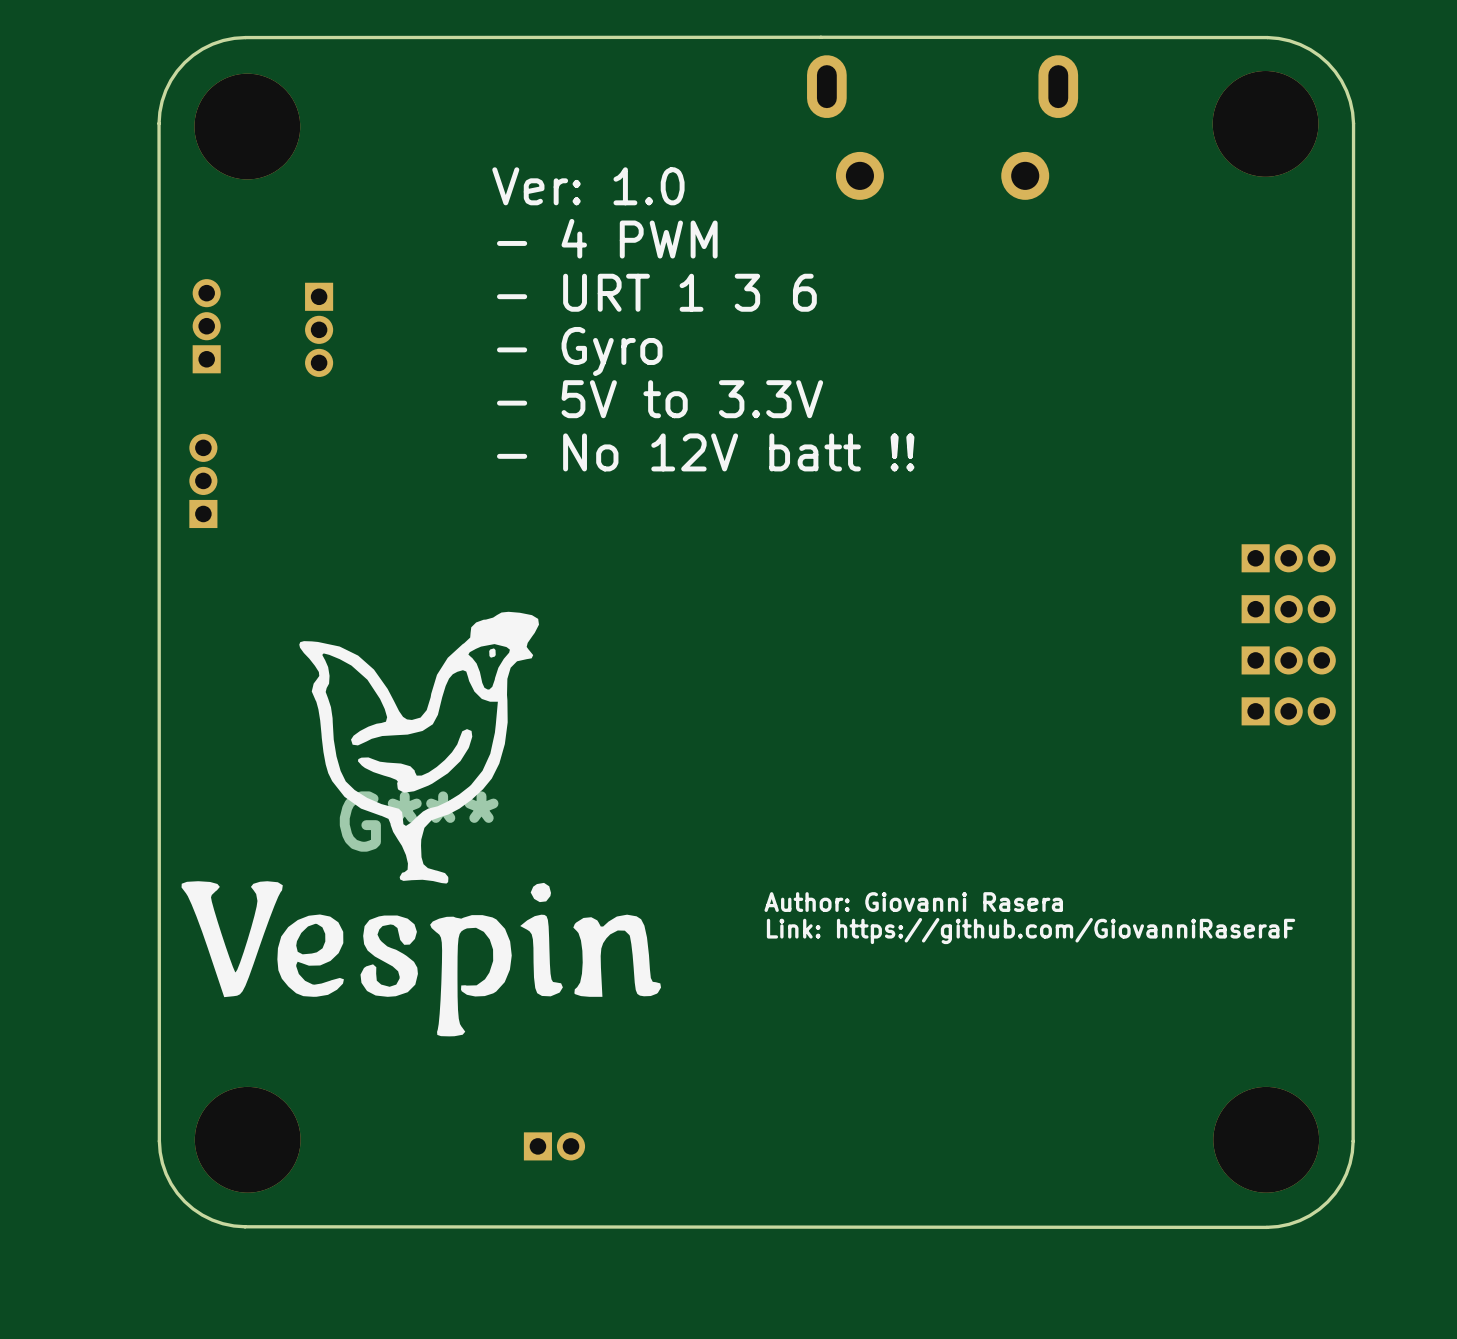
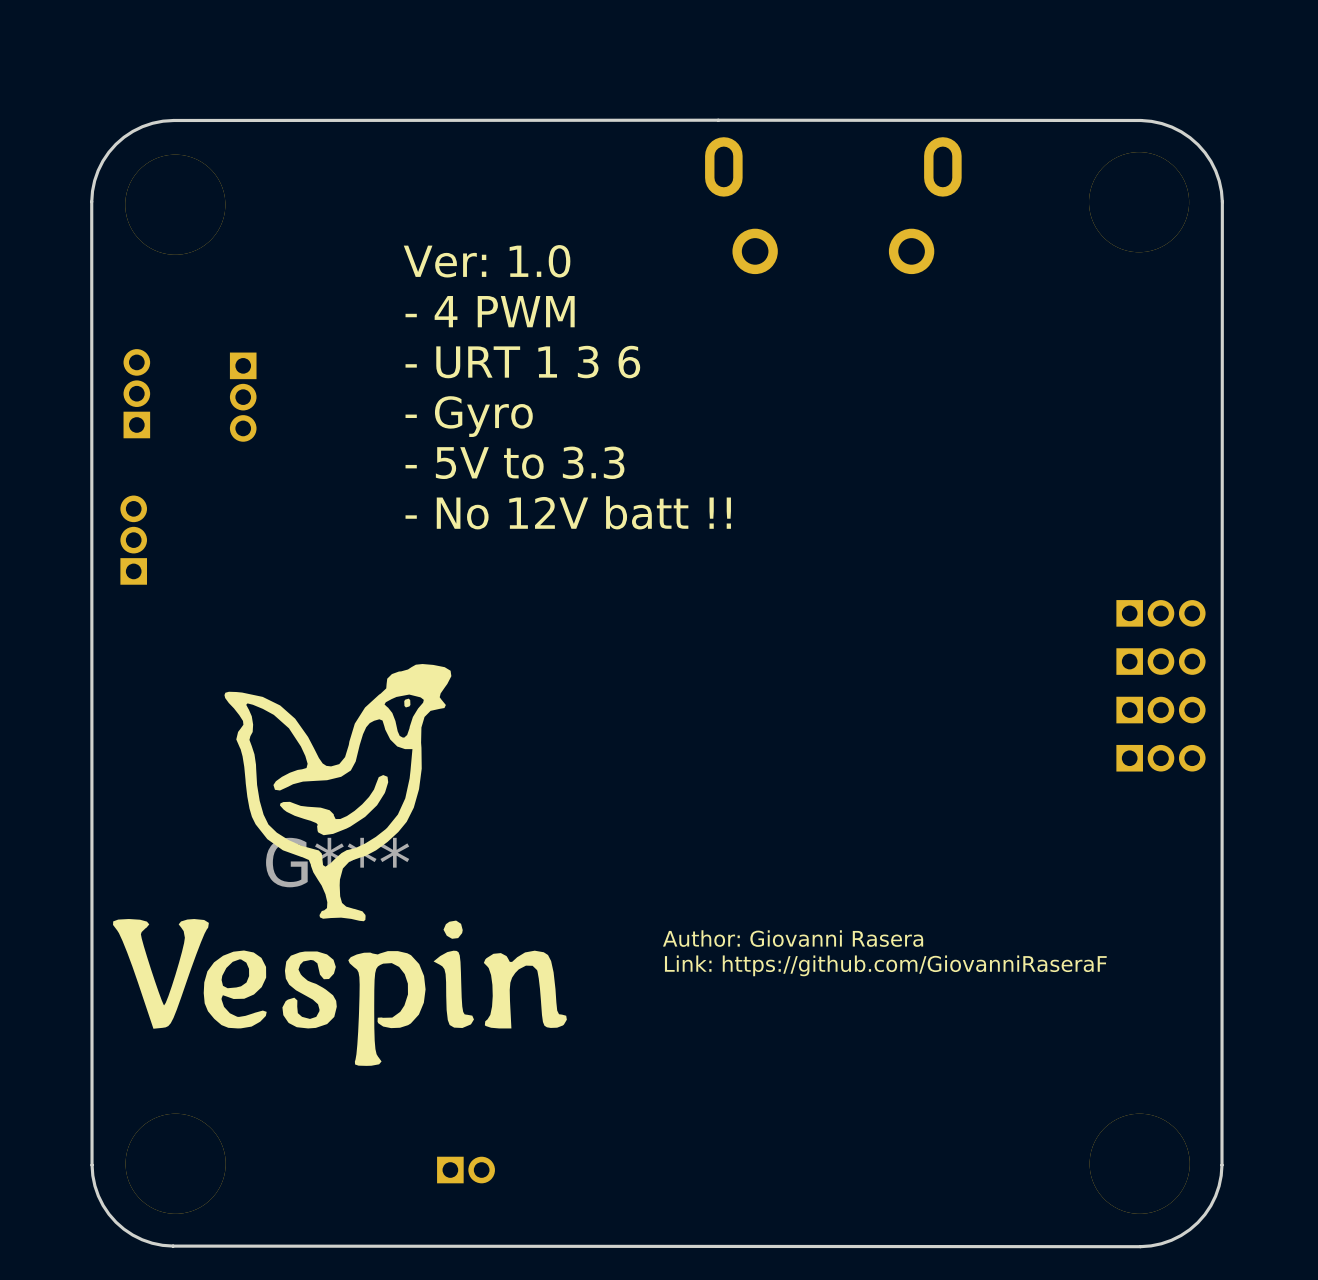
text: - 5V to 3.3V (660, 399) -> - 5V to 3.3 (514, 462)

